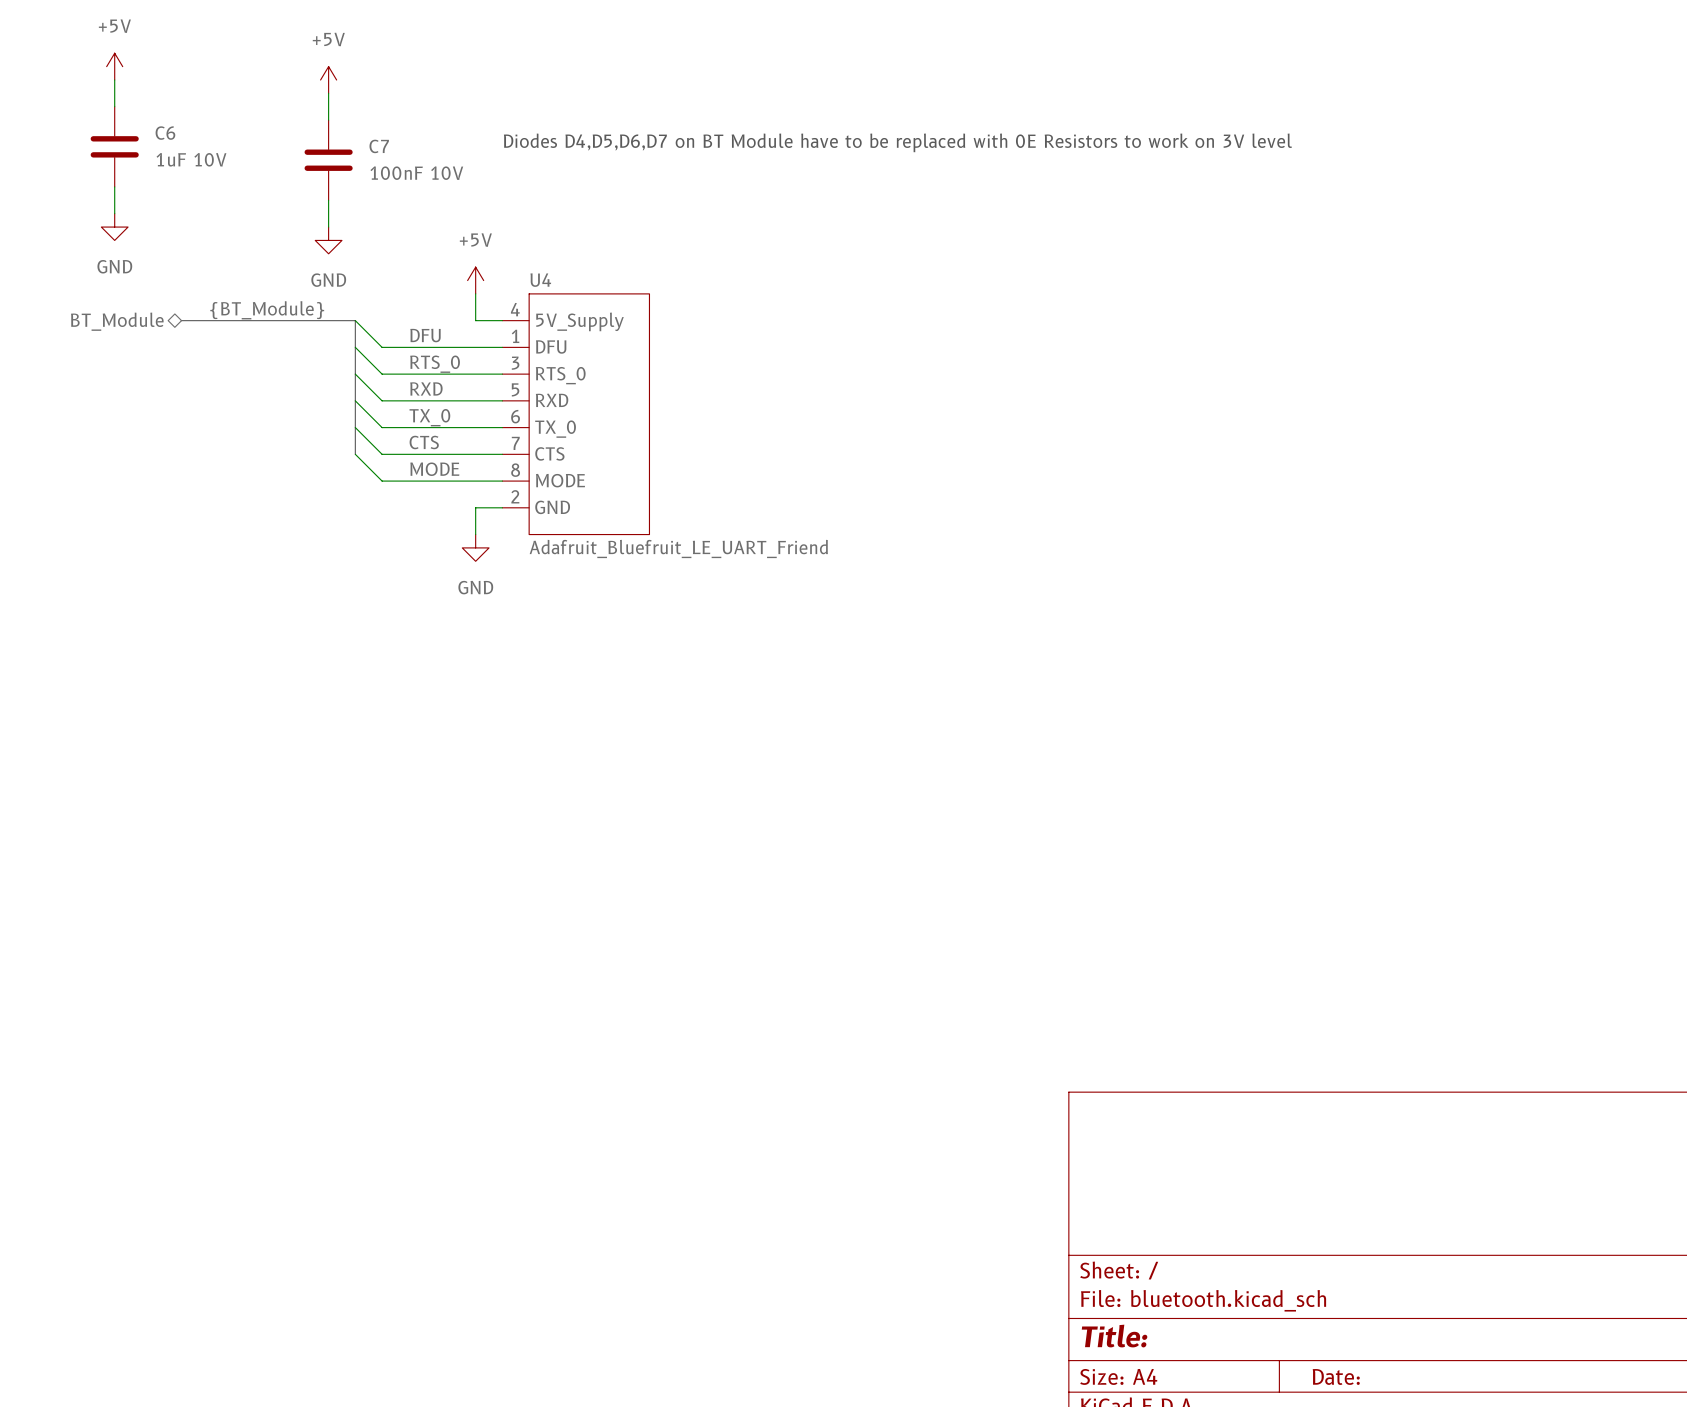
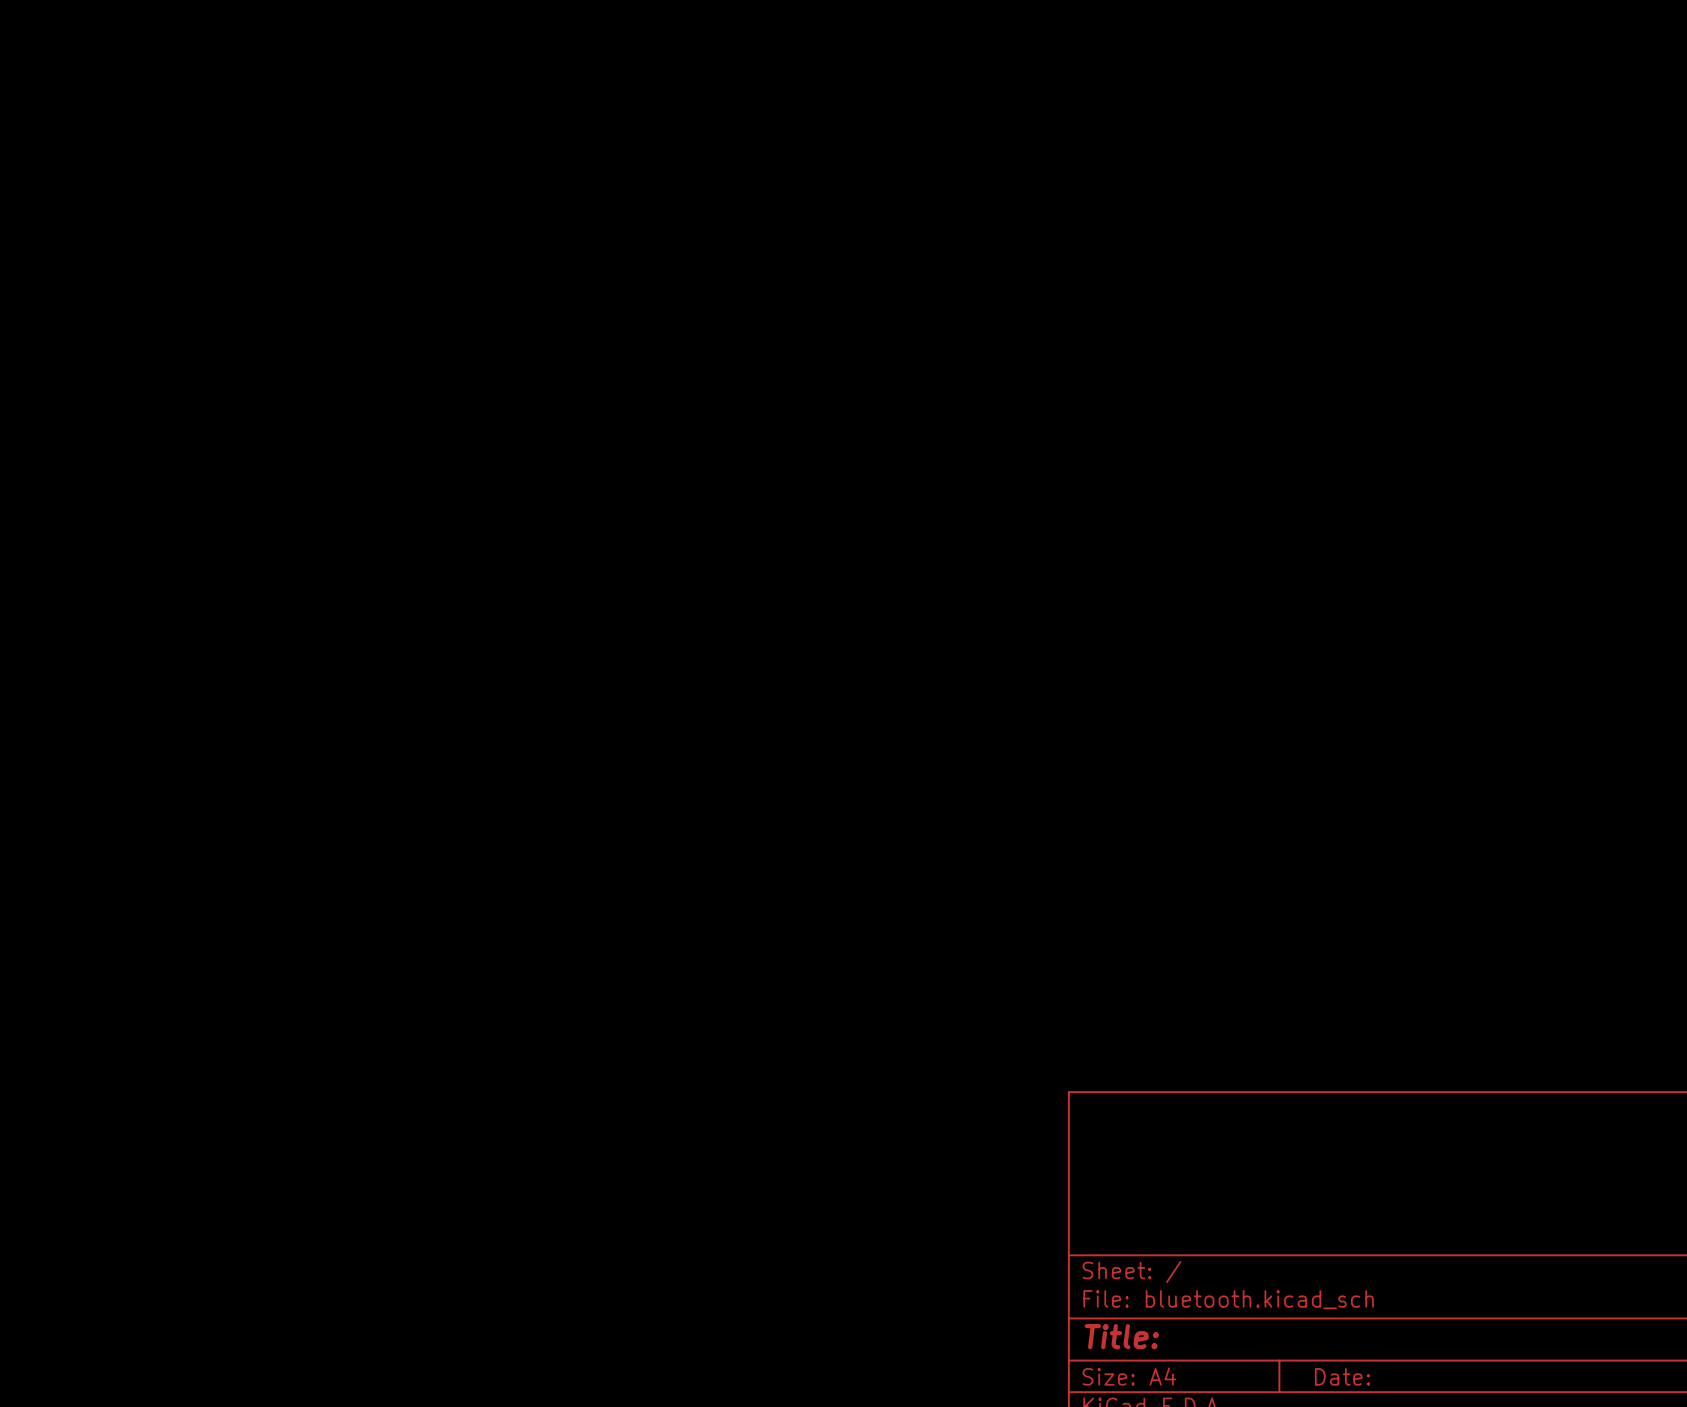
power symbol: +5V (114, 66) -> none
wire: (114, 80) (114, 106) -> none
power symbol: +5V (328, 80) -> none
wire: (328, 93) (328, 120) -> none
text: Diodes D4,D5,D6,D7 on BT Module have to be replaced with 0E Resistors to work on 3V level (897, 142) -> none
C6: 1uF 10V (114, 146) -> none
C7: 100nF 10V (328, 160) -> none
wire: (114, 186) (114, 213) -> none
wire: (328, 200) (328, 227) -> none
power symbol: GND (114, 227) -> none
power symbol: GND (328, 240) -> none
power symbol: +5V (475, 280) -> none
wire: (475, 293) (475, 320) (502, 320) -> none
label: {BT_Module} (267, 310) -> none
bus: (181, 320) (355, 320) (355, 454) -> none
wire: (355, 320) (382, 347) (502, 347) -> none
hierarchical label: BT_Module (117, 321) -> none
label: DFU (425, 335) -> none
wire: (355, 347) (382, 374) (502, 374) -> none
label: RTS_0 (435, 364) -> none
wire: (355, 374) (382, 400) (502, 400) -> none
label: RXD (426, 388) -> none
wire: (355, 400) (382, 427) (502, 427) -> none
U4: Adafruit_Bluefruit_LE_UART_Friend (575, 414) -> none
label: TX_0 (429, 417) -> none
wire: (355, 427) (382, 454) (502, 454) -> none
label: CTS (424, 442) -> none
wire: (355, 454) (382, 481) (502, 481) -> none
label: MODE (434, 469) -> none
wire: (502, 507) (475, 507) (475, 534) -> none
power symbol: GND (475, 547) -> none

